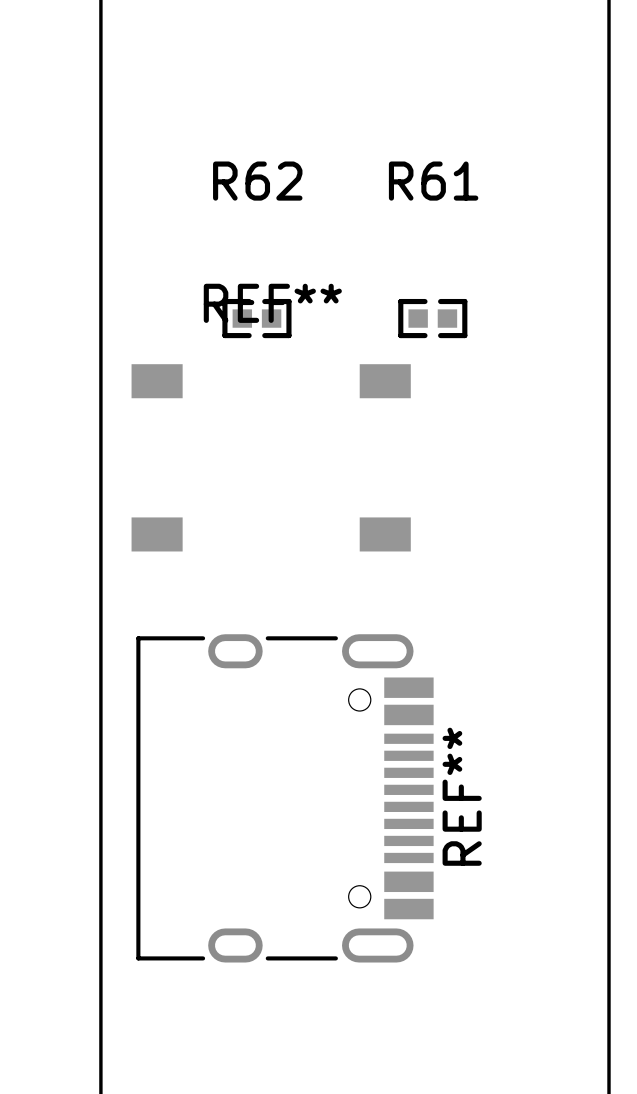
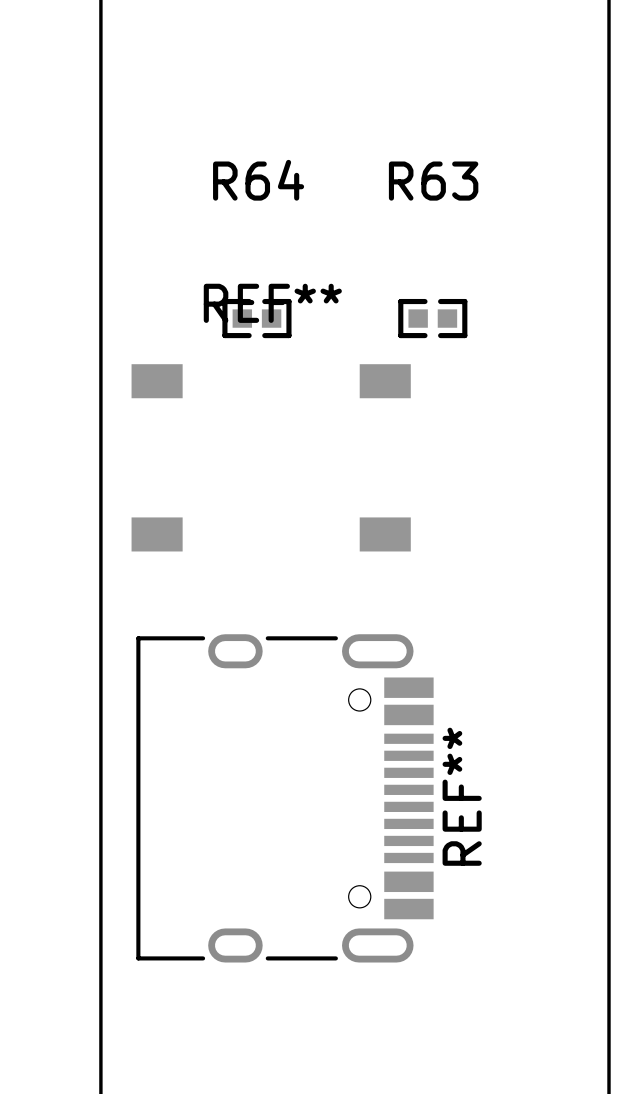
R62 name: R62 (257, 181) -> R64 (258, 180)
R61 name: R61 (433, 181) -> R63 (433, 181)

